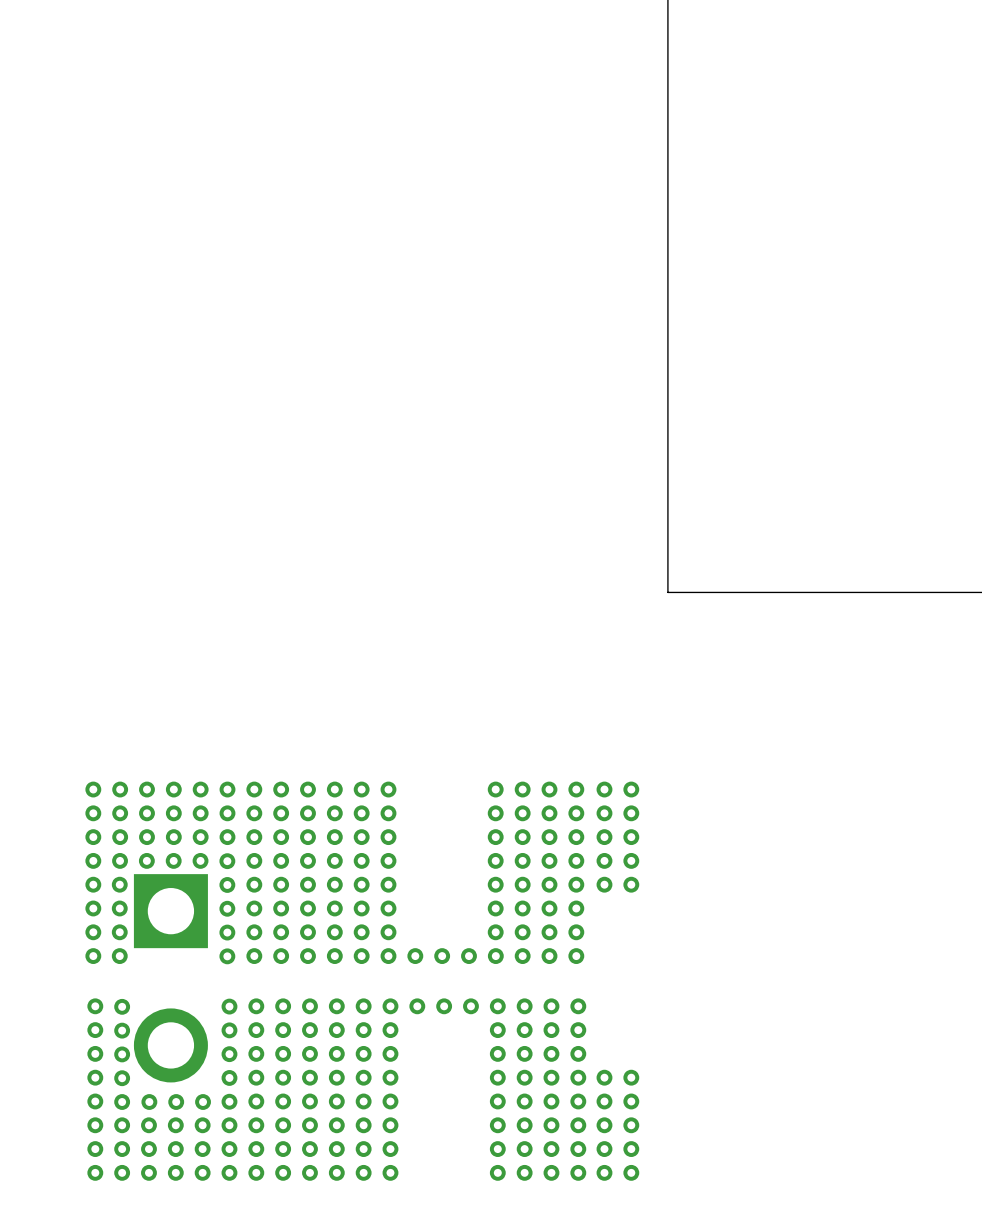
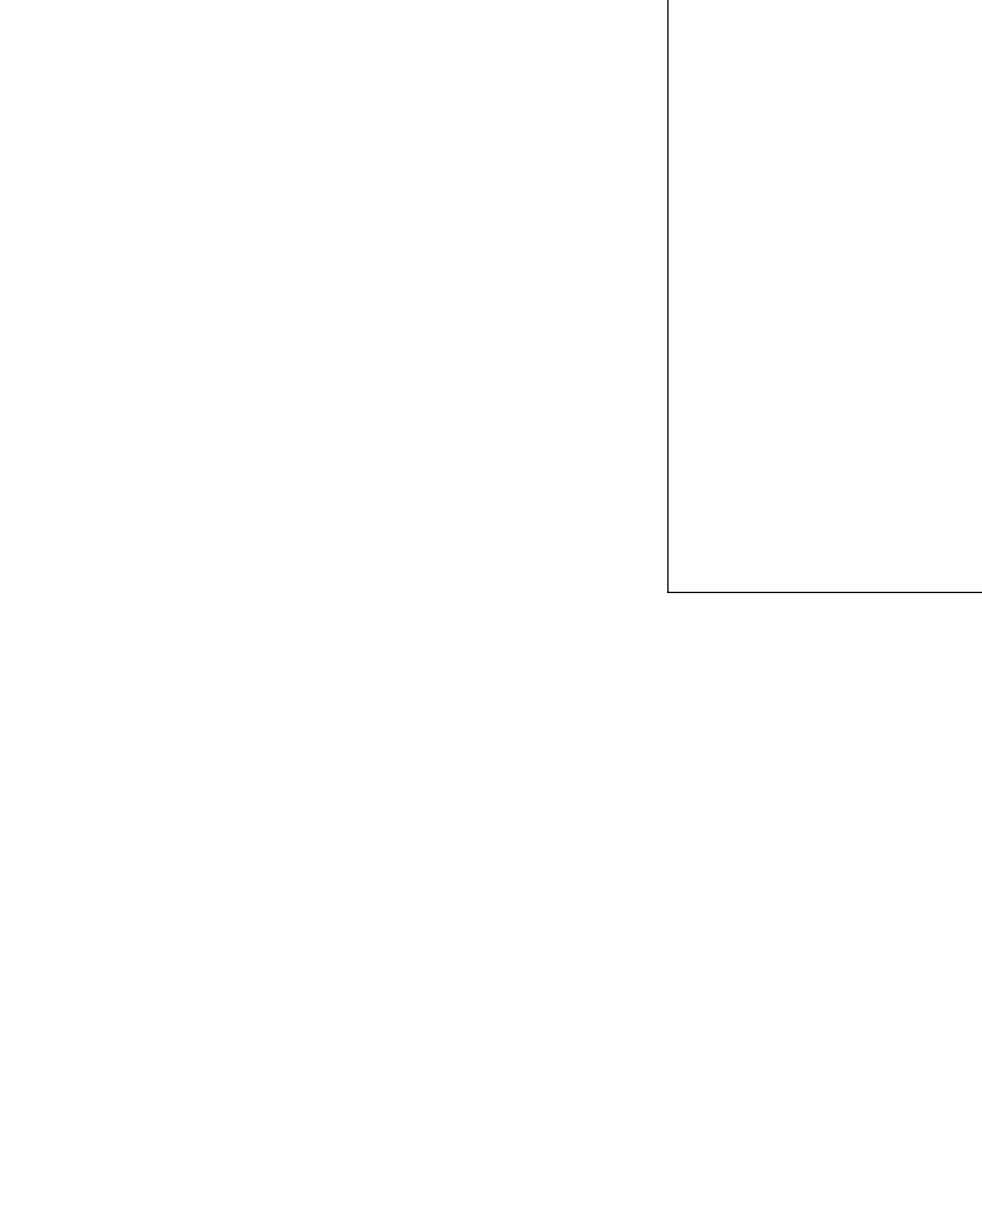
via: (93, 789) -> none
via: (120, 789) -> none
via: (146, 789) -> none
via: (173, 789) -> none
via: (200, 789) -> none
via: (227, 789) -> none
via: (254, 789) -> none
via: (281, 789) -> none
via: (307, 789) -> none
via: (334, 789) -> none
via: (361, 789) -> none
via: (388, 789) -> none
via: (495, 789) -> none
via: (522, 789) -> none
via: (549, 789) -> none
via: (576, 789) -> none
via: (604, 789) -> none
via: (631, 789) -> none
via: (93, 813) -> none
via: (120, 813) -> none
via: (146, 813) -> none
via: (173, 813) -> none
via: (200, 813) -> none
via: (227, 813) -> none
via: (254, 813) -> none
via: (281, 813) -> none
via: (307, 813) -> none
via: (334, 813) -> none
via: (361, 813) -> none
via: (388, 813) -> none
via: (495, 813) -> none
via: (522, 813) -> none
via: (549, 813) -> none
via: (576, 813) -> none
via: (604, 813) -> none
via: (631, 813) -> none
via: (93, 837) -> none
via: (120, 837) -> none
via: (146, 837) -> none
via: (173, 837) -> none
via: (200, 837) -> none
via: (227, 837) -> none
via: (254, 837) -> none
via: (281, 837) -> none
via: (307, 837) -> none
via: (334, 837) -> none
via: (361, 837) -> none
via: (388, 837) -> none
via: (495, 837) -> none
via: (522, 837) -> none
via: (549, 837) -> none
via: (576, 837) -> none
via: (604, 837) -> none
via: (631, 837) -> none
via: (93, 860) -> none
via: (120, 860) -> none
via: (146, 860) -> none
via: (173, 860) -> none
via: (200, 860) -> none
via: (254, 860) -> none
via: (281, 860) -> none
via: (307, 860) -> none
via: (334, 860) -> none
via: (361, 860) -> none
via: (388, 860) -> none
via: (495, 860) -> none
via: (522, 860) -> none
via: (549, 860) -> none
via: (576, 860) -> none
via: (604, 860) -> none
via: (631, 860) -> none
via: (227, 861) -> none
via: (93, 884) -> none
via: (119, 884) -> none
via: (227, 884) -> none
via: (254, 884) -> none
via: (281, 884) -> none
via: (307, 884) -> none
via: (334, 884) -> none
via: (361, 884) -> none
via: (388, 884) -> none
via: (495, 884) -> none
via: (522, 884) -> none
via: (549, 884) -> none
via: (576, 884) -> none
via: (604, 884) -> none
via: (631, 884) -> none
via: (93, 908) -> none
via: (119, 908) -> none
via: (227, 908) -> none
via: (254, 908) -> none
via: (281, 908) -> none
via: (307, 908) -> none
via: (334, 908) -> none
via: (361, 908) -> none
via: (388, 908) -> none
via: (495, 908) -> none
via: (522, 908) -> none
via: (549, 908) -> none
via: (576, 908) -> none
via: (93, 932) -> none
via: (119, 932) -> none
via: (227, 932) -> none
via: (254, 932) -> none
via: (281, 932) -> none
via: (307, 932) -> none
via: (334, 932) -> none
via: (361, 932) -> none
via: (388, 932) -> none
via: (495, 932) -> none
via: (522, 932) -> none
via: (549, 932) -> none
via: (576, 932) -> none
via: (93, 956) -> none
via: (119, 956) -> none
via: (227, 956) -> none
via: (254, 956) -> none
via: (281, 956) -> none
via: (307, 956) -> none
via: (334, 956) -> none
via: (361, 956) -> none
via: (388, 956) -> none
via: (415, 956) -> none
via: (442, 956) -> none
via: (468, 956) -> none
via: (495, 956) -> none
via: (522, 956) -> none
via: (549, 956) -> none
via: (576, 956) -> none
part: (170, 978) -> none
via: (95, 1006) -> none
via: (122, 1006) -> none
via: (229, 1006) -> none
via: (256, 1006) -> none
via: (283, 1006) -> none
via: (309, 1006) -> none
via: (336, 1006) -> none
via: (363, 1006) -> none
via: (390, 1006) -> none
via: (417, 1006) -> none
via: (444, 1006) -> none
via: (470, 1006) -> none
via: (497, 1006) -> none
via: (524, 1006) -> none
via: (551, 1006) -> none
via: (578, 1006) -> none
via: (95, 1030) -> none
via: (122, 1030) -> none
via: (229, 1030) -> none
via: (256, 1030) -> none
via: (283, 1030) -> none
via: (309, 1030) -> none
via: (336, 1030) -> none
via: (363, 1030) -> none
via: (390, 1030) -> none
via: (497, 1030) -> none
via: (524, 1030) -> none
via: (551, 1030) -> none
via: (578, 1030) -> none
via: (95, 1053) -> none
via: (256, 1053) -> none
via: (283, 1053) -> none
via: (309, 1053) -> none
via: (336, 1053) -> none
via: (363, 1053) -> none
via: (390, 1053) -> none
via: (497, 1053) -> none
via: (524, 1053) -> none
via: (551, 1053) -> none
via: (578, 1053) -> none
via: (122, 1054) -> none
via: (229, 1054) -> none
via: (95, 1077) -> none
via: (229, 1077) -> none
via: (256, 1077) -> none
via: (283, 1077) -> none
via: (309, 1077) -> none
via: (336, 1077) -> none
via: (363, 1077) -> none
via: (390, 1077) -> none
via: (497, 1077) -> none
via: (524, 1077) -> none
via: (551, 1077) -> none
via: (578, 1077) -> none
via: (604, 1077) -> none
via: (631, 1077) -> none
via: (122, 1078) -> none
via: (95, 1101) -> none
via: (229, 1101) -> none
via: (256, 1101) -> none
via: (283, 1101) -> none
via: (309, 1101) -> none
via: (336, 1101) -> none
via: (363, 1101) -> none
via: (390, 1101) -> none
via: (497, 1101) -> none
via: (524, 1101) -> none
via: (551, 1101) -> none
via: (578, 1101) -> none
via: (604, 1101) -> none
via: (631, 1101) -> none
via: (122, 1102) -> none
via: (149, 1102) -> none
via: (176, 1102) -> none
via: (203, 1102) -> none
via: (95, 1125) -> none
via: (122, 1125) -> none
via: (148, 1125) -> none
via: (175, 1125) -> none
via: (202, 1125) -> none
via: (229, 1125) -> none
via: (256, 1125) -> none
via: (283, 1125) -> none
via: (309, 1125) -> none
via: (336, 1125) -> none
via: (363, 1125) -> none
via: (390, 1125) -> none
via: (497, 1125) -> none
via: (524, 1125) -> none
via: (551, 1125) -> none
via: (578, 1125) -> none
via: (604, 1125) -> none
via: (631, 1125) -> none
via: (95, 1149) -> none
via: (122, 1149) -> none
via: (148, 1149) -> none
via: (175, 1149) -> none
via: (202, 1149) -> none
via: (229, 1149) -> none
via: (256, 1149) -> none
via: (283, 1149) -> none
via: (309, 1149) -> none
via: (336, 1149) -> none
via: (363, 1149) -> none
via: (390, 1149) -> none
via: (497, 1149) -> none
via: (524, 1149) -> none
via: (551, 1149) -> none
via: (578, 1149) -> none
via: (604, 1149) -> none
via: (631, 1149) -> none
via: (95, 1172) -> none
via: (122, 1172) -> none
via: (148, 1172) -> none
via: (175, 1172) -> none
via: (202, 1172) -> none
via: (229, 1172) -> none
via: (256, 1172) -> none
via: (283, 1172) -> none
via: (309, 1172) -> none
via: (336, 1172) -> none
via: (363, 1172) -> none
via: (390, 1172) -> none
via: (497, 1172) -> none
via: (524, 1172) -> none
via: (551, 1172) -> none
via: (578, 1172) -> none
via: (604, 1172) -> none
via: (631, 1172) -> none

